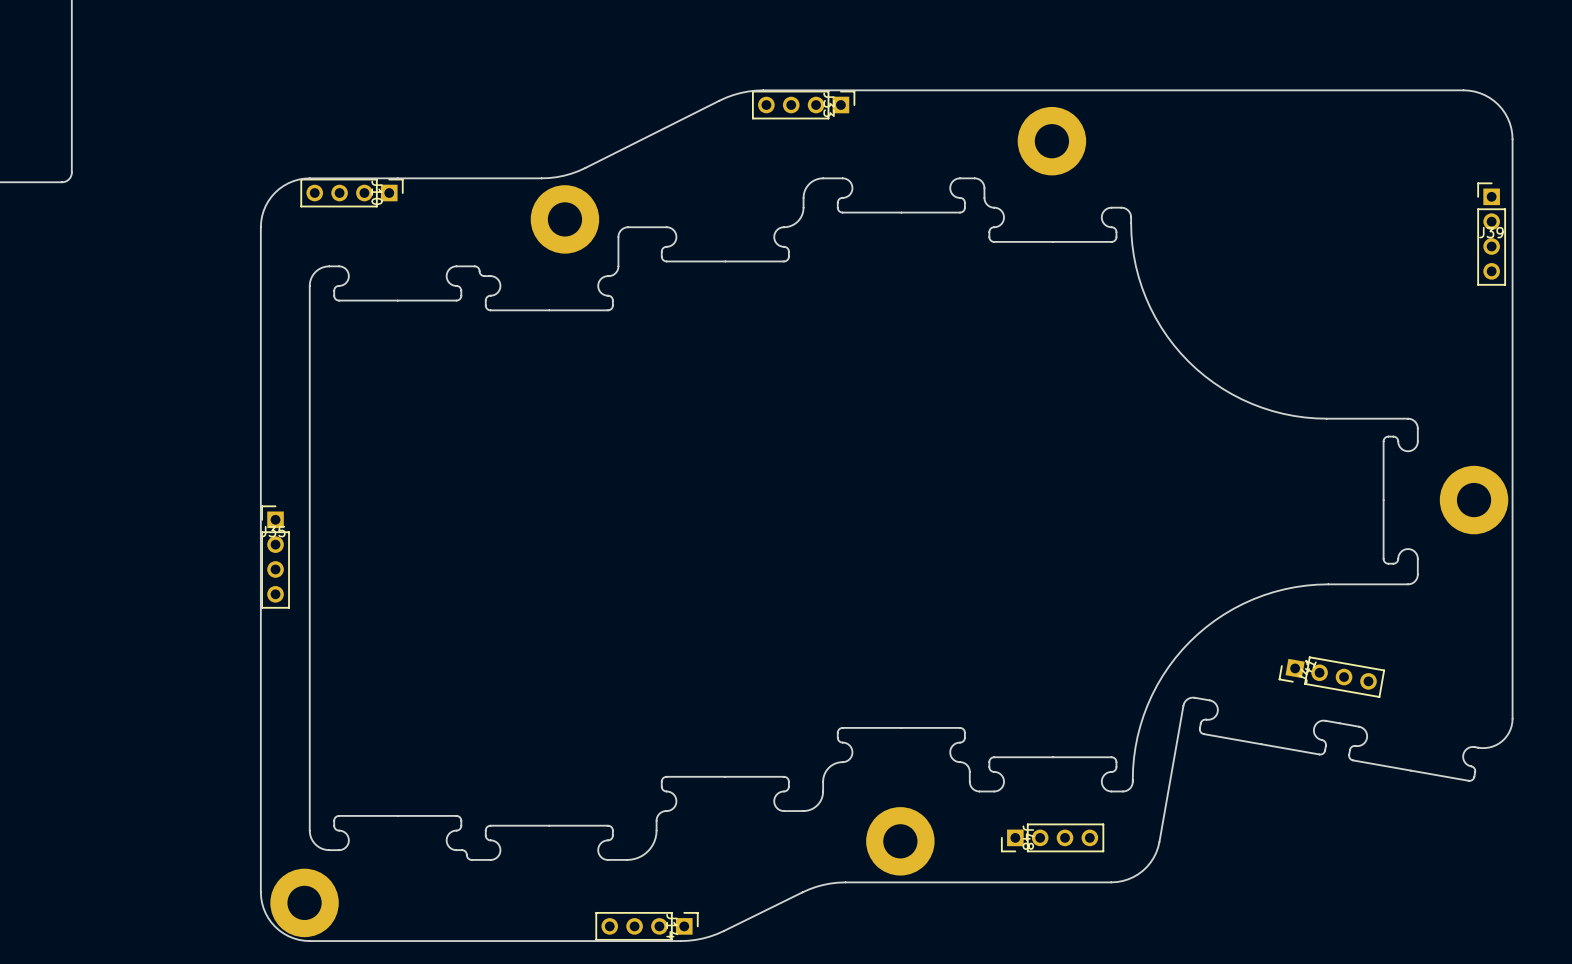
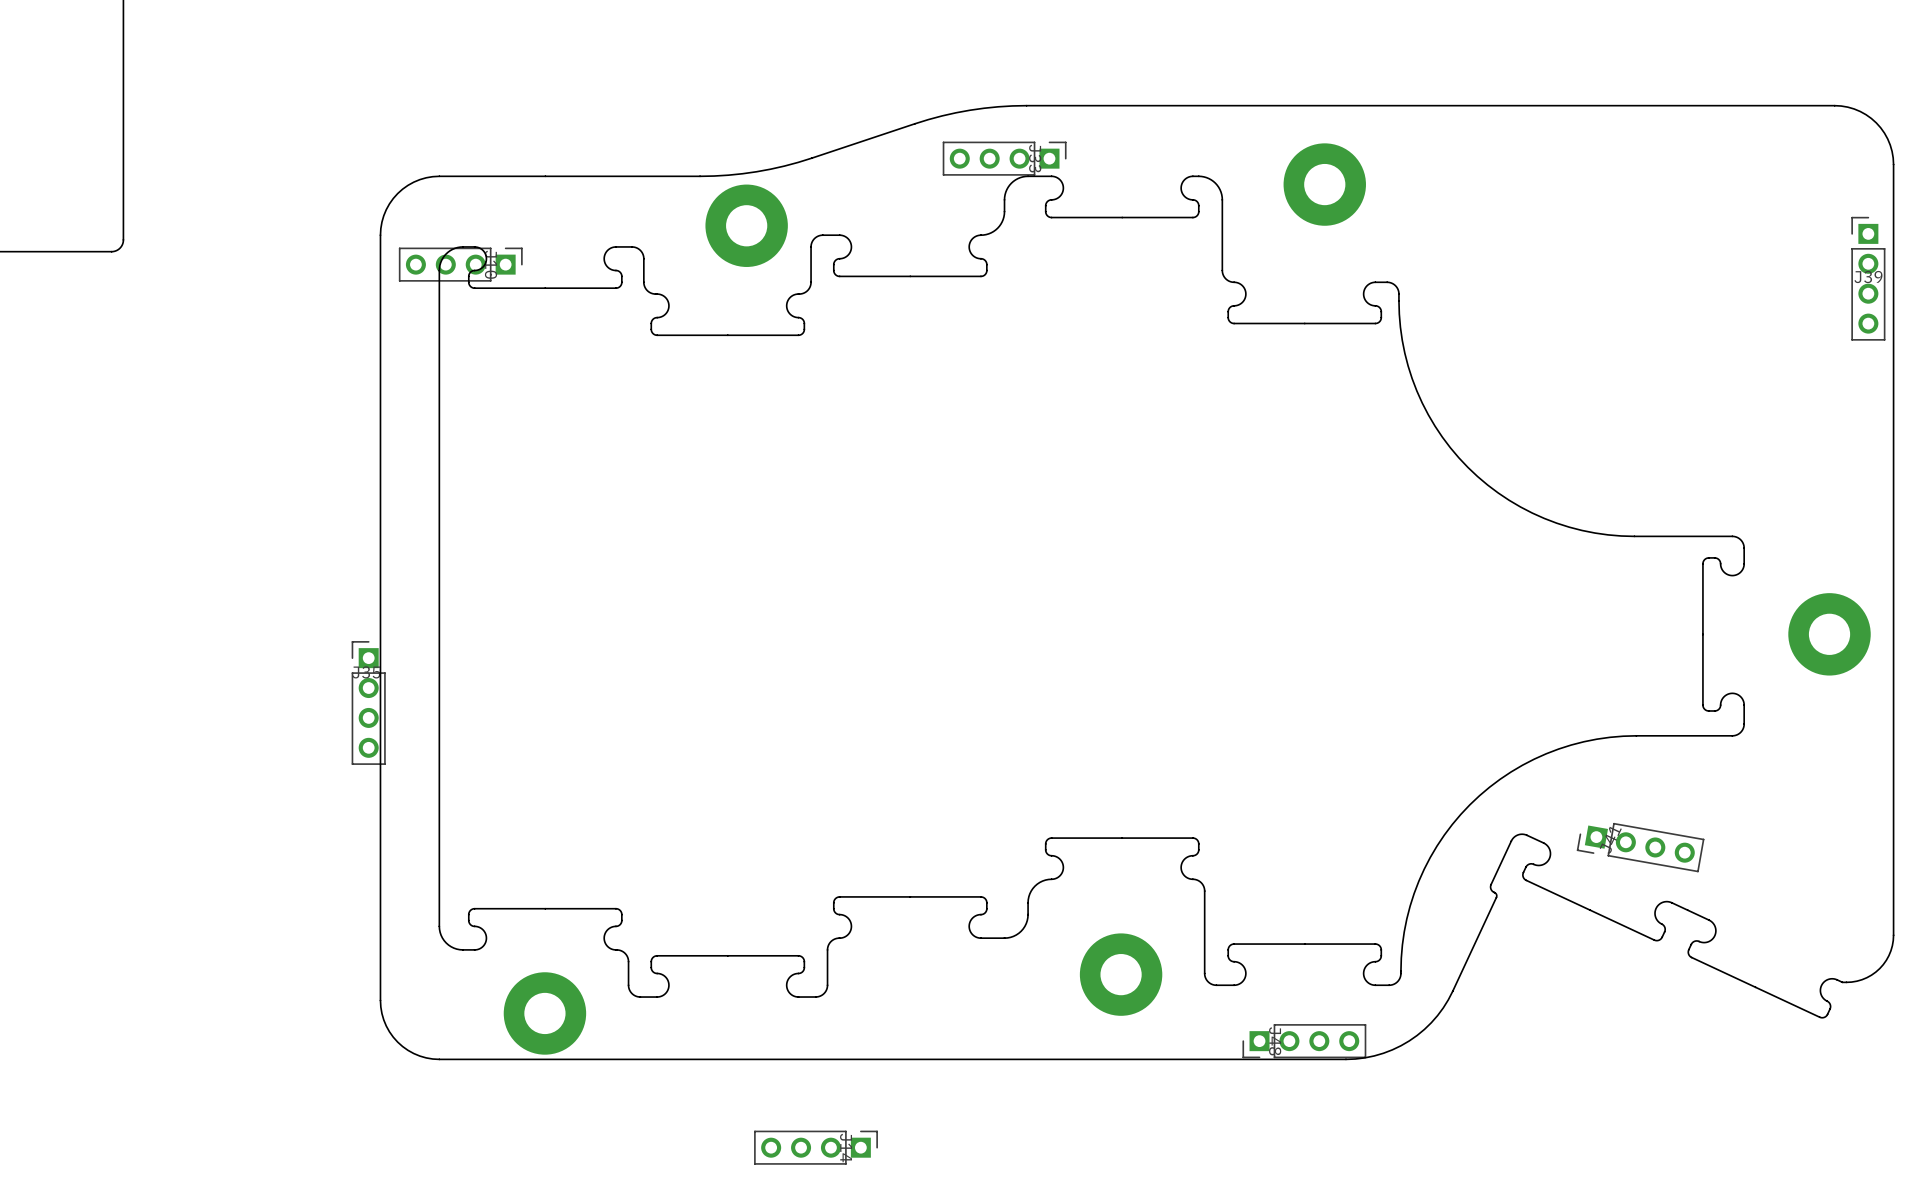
board edge: none -> (439, 176) (700, 176) (742, 173) (798, 162) (942, 115) (970, 110) (1012, 105) (1834, 105) (1860, 111) (1876, 122) (1884, 133) (1892, 151) (1893, 164) (1893, 935) (1888, 955) (1879, 968) (1862, 979) (1842, 982) (1831, 978) (1824, 981) (1820, 987) (1820, 993) (1830, 1007) (1826, 1016) (1820, 1017) (1690, 956) (1688, 951) (1692, 942) (1707, 942) (1714, 935) (1715, 927) (1709, 920) (1670, 902) (1662, 902) (1656, 907) (1655, 915) (1657, 920) (1664, 926) (1665, 930) (1661, 938) (1655, 940) (1525, 880) (1522, 874) (1527, 865) (1544, 864) (1549, 858) (1550, 852) (1545, 843) (1520, 834) (1512, 839) (1491, 884) (1491, 889) (1496, 896) (1443, 1007) (1431, 1022) (1409, 1040) (1383, 1053) (1364, 1057) (1345, 1059) (439, 1059) (413, 1053) (402, 1046) (389, 1031) (381, 1013) (380, 1000) (380, 235) (383, 215) (397, 193) (419, 179) (439, 176)
part position: (1051, 141) -> (1324, 184)
board edge: (353, 178) (309, 178) -> (462, 246) (448, 252) (439, 265) (439, 382)
board edge: (480, 178) (363, 178) -> (615, 246) (608, 249) (604, 258) (608, 267) (621, 274) (621, 284) (615, 288) (473, 287) (468, 283) (469, 274) (482, 267) (486, 258) (482, 250) (474, 246)
board edge: (494, 178) (549, 178) (571, 173) (726, 97) (755, 90) (1463, 90) (1484, 95) (1498, 104) (1505, 113) (1509, 123) (1512, 139) (1512, 718) (1508, 732) (1502, 741) (1492, 746) (1472, 746) (1465, 750) (1463, 756) (1464, 761) (1475, 770) (1473, 778) (1468, 780) (1351, 760) (1349, 756) (1350, 748) (1362, 744) (1367, 738) (1365, 731) (1359, 726) (1324, 720) (1317, 722) (1314, 727) (1314, 734) (1325, 744) (1324, 751) (1320, 754) (1203, 733) (1199, 730) (1201, 722) (1214, 717) (1217, 711) (1217, 706) (1211, 700) (1190, 697) (1185, 701) (1183, 705) (1156, 852) (1142, 870) (1122, 881) (830, 883) (809, 889) (717, 934) (688, 940) (309, 941) (288, 936) (275, 926) (268, 918) (262, 903) (260, 892) (260, 227) (263, 211) (275, 192) (293, 181) (309, 178) -> none
board edge: (984, 197) (984, 185) (980, 180) (975, 178) (958, 178) (951, 182) (950, 189) (953, 195) (964, 200) (964, 208) (961, 212) (842, 212) (838, 209) (837, 201) (851, 193) (852, 186) (850, 182) (843, 178) (816, 179) (805, 189) (803, 212) (799, 219) (792, 225) (779, 228) (774, 233) (776, 243) (788, 249) (788, 257) (784, 261) (665, 261) (661, 257) (661, 250) (675, 241) (676, 234) (672, 229) (666, 227) (624, 227) (618, 234) (617, 270) (612, 275) (602, 278) (598, 284) (601, 292) (612, 298) (612, 306) (608, 310) (489, 310) (485, 306) (486, 298) (497, 292) (500, 283) (494, 276) (481, 275) (478, 268) (474, 266) (454, 266) (447, 271) (448, 281) (460, 288) (461, 296) (457, 300) (339, 300) (334, 295) -> (1222, 270) (1221, 194) (1213, 181) (1198, 176) (1187, 177) (1181, 186) (1185, 196) (1198, 203) (1198, 213) (1192, 217) (1050, 217) (1045, 213) (1045, 204) (1048, 200) (1057, 198) (1061, 193) (1063, 186) (1060, 180) (1051, 176) (1025, 176) (1017, 178) (1011, 183) (1005, 192) (1003, 216) (999, 226) (991, 232) (975, 236) (969, 242) (969, 248) (972, 254) (986, 262) (986, 272) (981, 276) (838, 276) (833, 272) (834, 262) (849, 254) (851, 248) (850, 242) (842, 235) (818, 235) (811, 244) (809, 287) (804, 292) (791, 296) (787, 303) (789, 313) (803, 321) (804, 330) (799, 335) (654, 334) (651, 330) (651, 321) (665, 313) (668, 303) (663, 296) (650, 292) (645, 288) (643, 254) (639, 249) (632, 246)
part position: (564, 219) -> (746, 225)
J39 position: (1491, 234) -> (1868, 278)
board edge: (334, 290) (336, 286) (343, 284) (347, 281) (348, 274) (346, 269) (340, 266) (327, 266) (315, 272) (309, 285) (309, 830) (312, 840) (317, 846) (326, 849) (339, 850) (347, 845) (348, 840) (347, 834) (334, 827) (334, 819) (337, 816) (456, 815) (460, 818) (461, 827) (449, 833) (447, 843) (452, 849) (464, 850) (470, 859) (491, 859) (499, 854) (498, 844) (486, 837) (486, 828) (490, 825) (609, 825) (612, 829) (612, 837) (599, 844) (598, 850) (599, 855) (606, 859) (634, 858) (645, 853) (652, 845) (658, 814) (671, 809) (675, 804) (673, 794) (662, 788) (661, 781) (664, 777) (785, 776) (788, 780) (788, 788) (775, 795) (774, 801) (775, 806) (782, 810) (808, 810) (817, 805) (821, 798) (823, 779) (827, 769) (835, 763) (847, 761) (851, 755) (849, 745) (838, 739) (838, 730) (842, 727) (961, 728) (964, 731) (964, 739) (953, 745) (950, 753) (954, 760) (966, 765) (969, 771) -> (439, 388) (439, 926) (442, 938) (448, 945) (459, 949) (474, 949) (484, 944) (486, 938) (484, 931) (469, 922) (468, 913) (473, 908) (616, 908) (621, 912) (621, 922) (607, 930) (604, 940) (609, 947) (621, 950) (626, 955) (628, 987) (635, 995) (658, 996) (667, 990) (668, 985) (666, 978) (651, 969) (651, 960) (655, 956) (798, 955) (803, 959) (804, 969) (788, 978) (786, 983) (788, 990) (795, 996) (817, 996) (824, 993) (827, 988) (828, 944) (834, 939) (846, 936) (851, 929) (848, 918) (834, 911) (833, 901) (837, 897) (982, 897) (986, 901) (986, 910) (971, 919) (969, 926) (971, 933) (979, 938) (1007, 937) (1016, 934) (1024, 926) (1027, 917) (1028, 896) (1032, 888) (1042, 881) (1057, 877) (1062, 871) (1063, 864) (1060, 859) (1046, 852) (1045, 843) (1048, 838) (1192, 838) (1198, 841) (1198, 851) (1195, 855) (1184, 859) (1181, 869) (1185, 876) (1199, 881) (1204, 888) (1204, 961)
part position: (1474, 500) -> (1829, 634)
part position: (900, 841) -> (1121, 974)
part position: (304, 902) -> (544, 1013)

